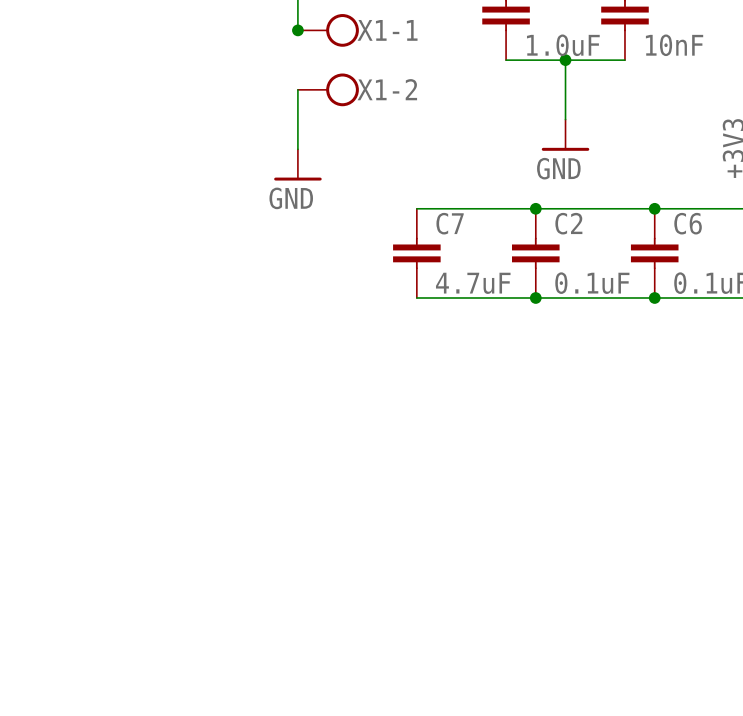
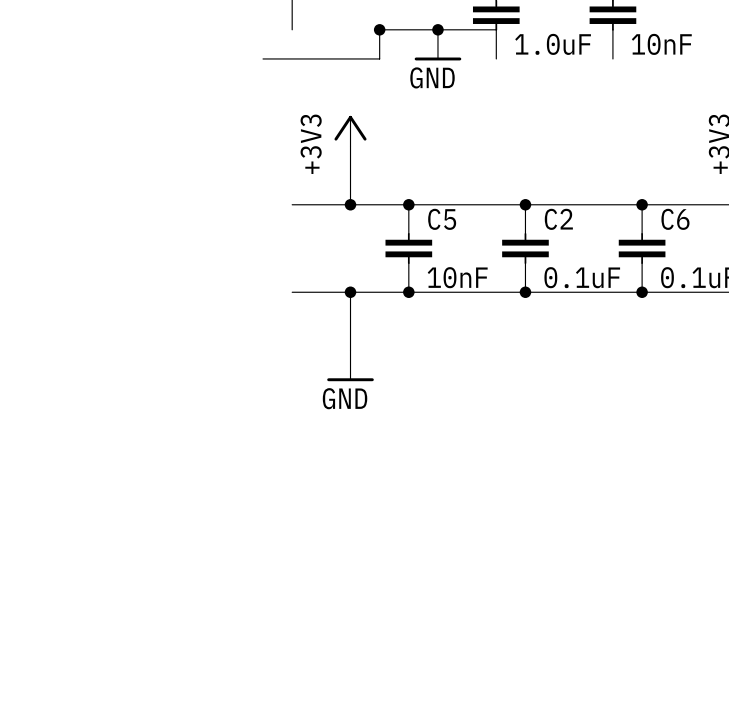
junction: (297, 30) -> none
X1-1: (328, 30) -> none
junction: none -> (379, 29)
junction: none -> (437, 29)
wire: none -> (496, 29) (379, 29) (379, 58) (263, 58)
power symbol: none -> GND (437, 45)
wire: (506, 60) (624, 60) -> (292, 204) (408, 204)
wire: (565, 60) (565, 119) -> none
junction: (565, 60) -> none
wire: (297, 89) (297, 149) -> (350, 146) (350, 204)
X1-2: (328, 89) -> none
power symbol: none -> +3V3 (350, 131)
power symbol: GND (565, 135) -> none
power symbol: GND (297, 164) -> none
junction: none -> (350, 204)
junction: none -> (408, 204)
C7 name: C7 (450, 223) -> C5 (442, 219)
C7 value: 4.7uF (473, 283) -> 10nF (457, 277)
wire: none -> (292, 292) (408, 292)
wire: none -> (350, 292) (350, 350)
junction: none -> (350, 292)
junction: none -> (408, 292)
power symbol: none -> GND (350, 365)

